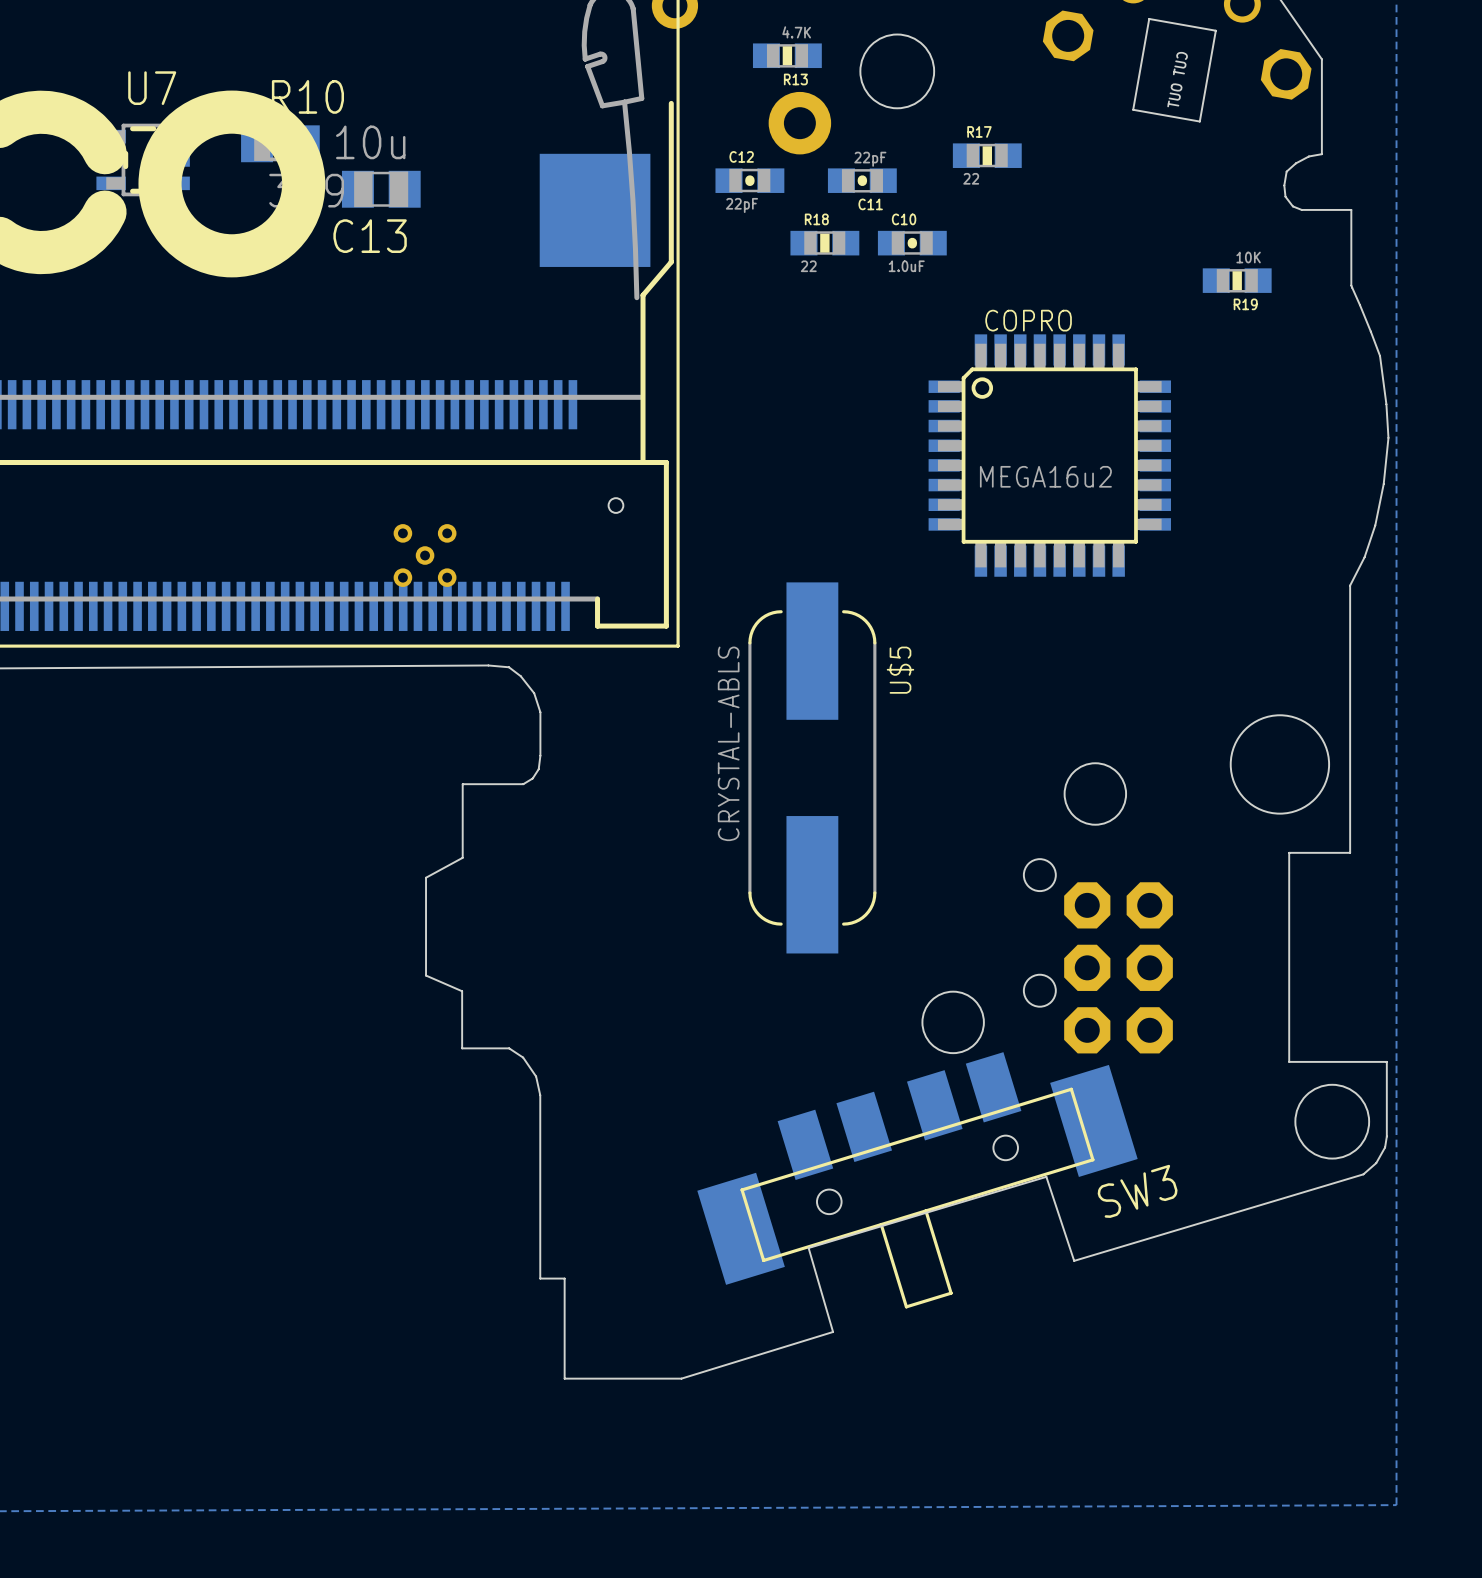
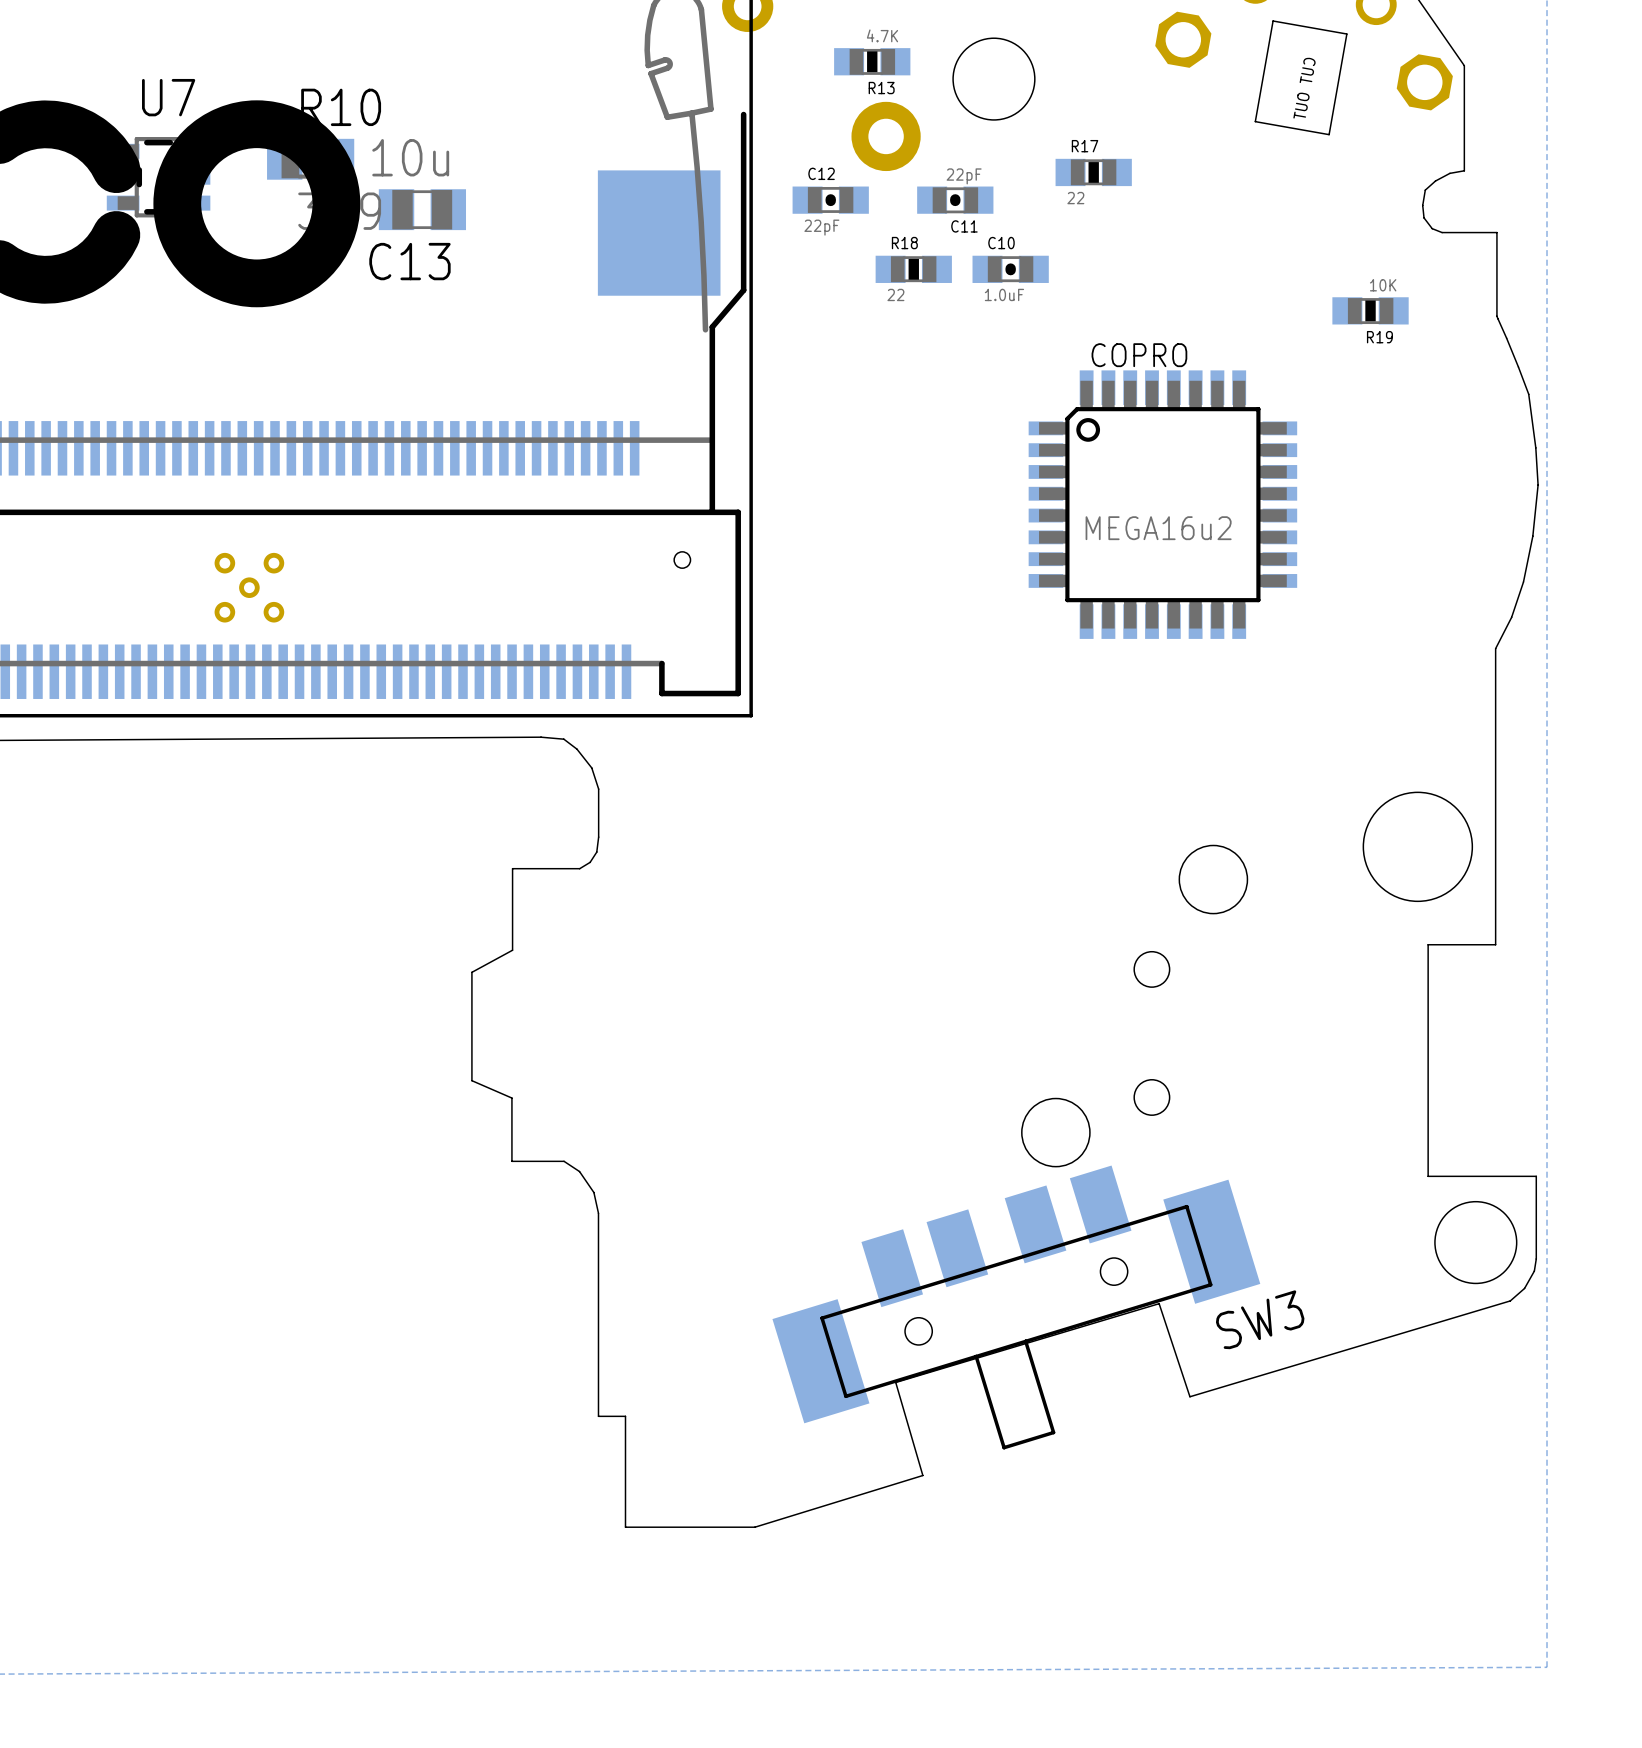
part position: (425, 555) -> (249, 587)
U$5: CRYSTAL-ABLS (812, 767) -> none
part: (1118, 967) -> none

